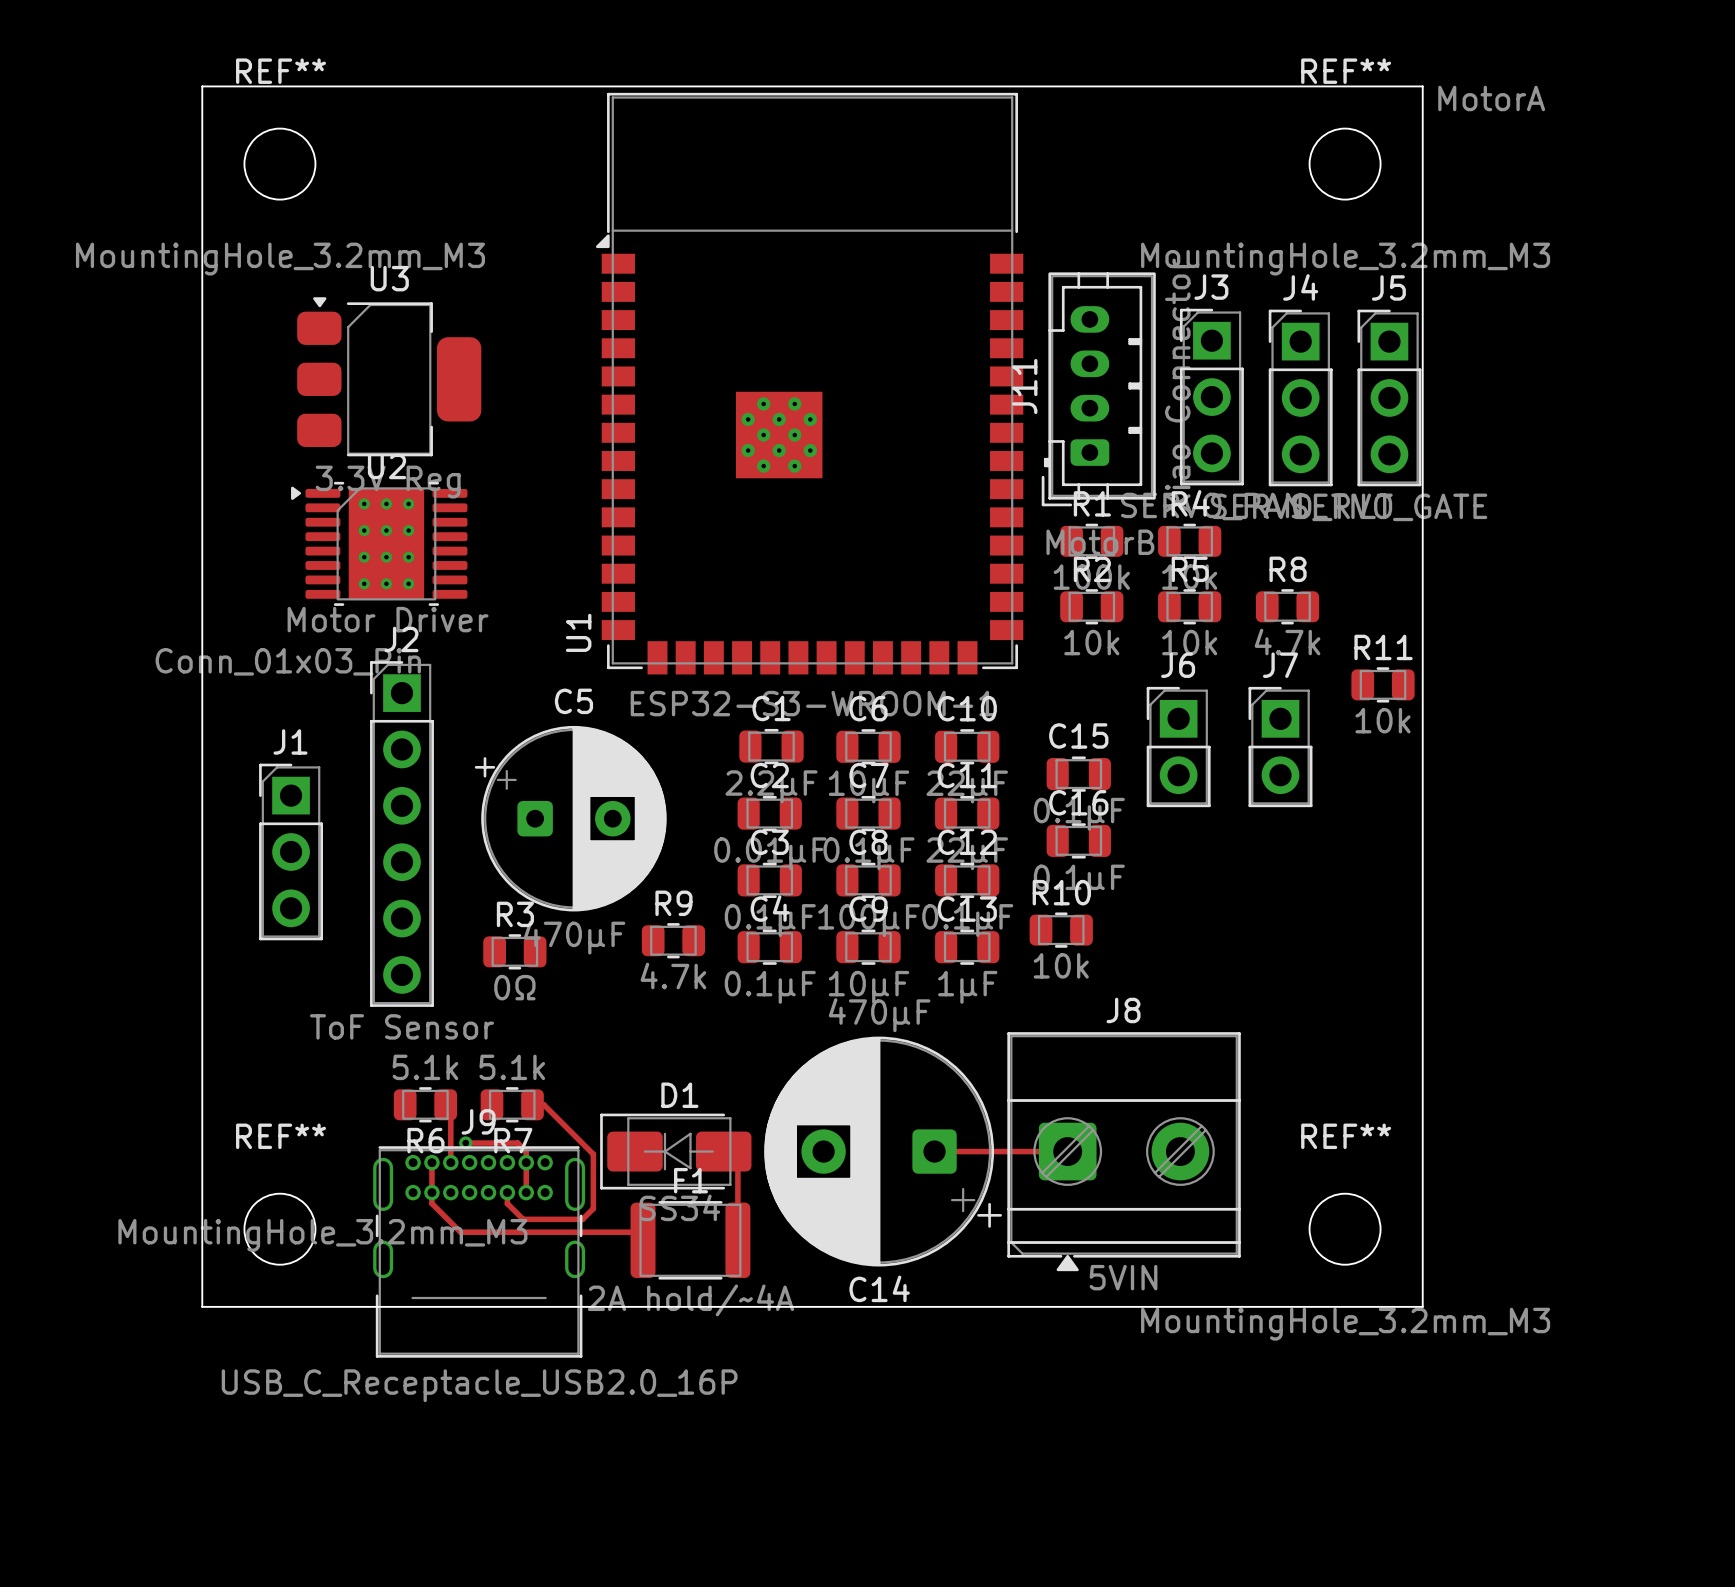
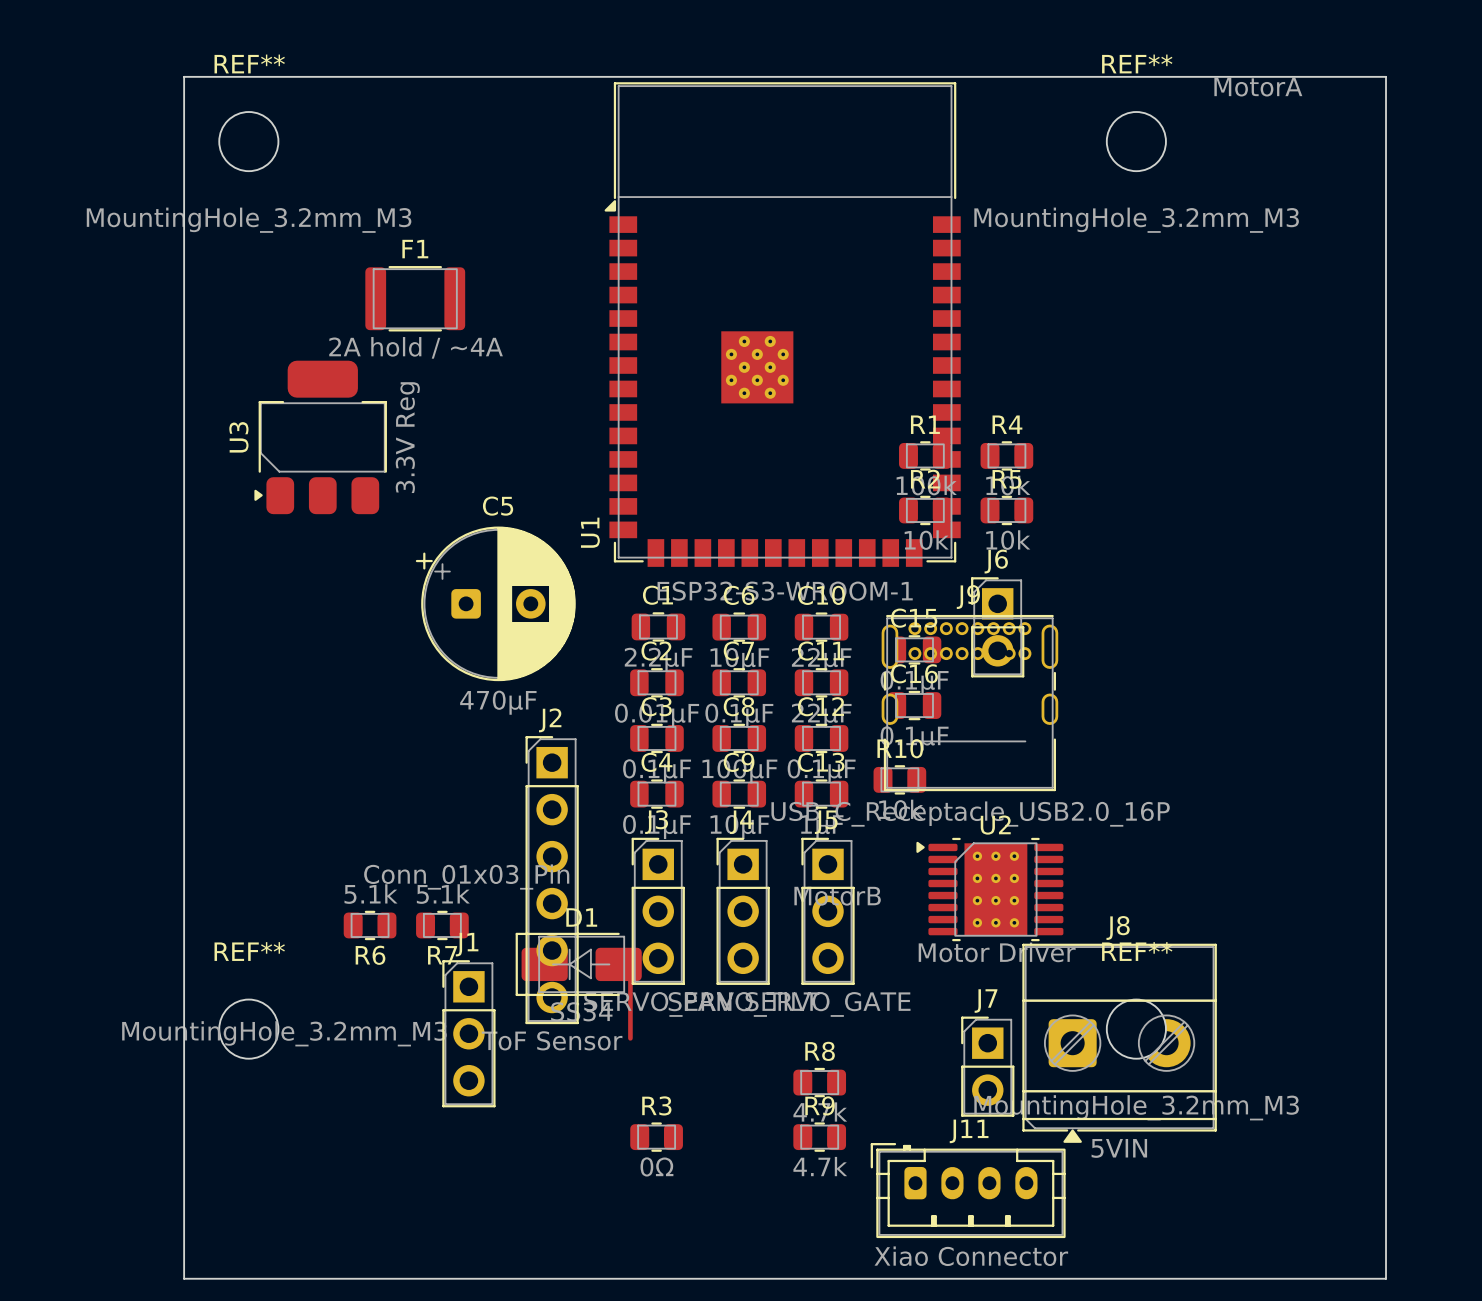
board edge: (1422, 86) (1422, 1306) (202, 1306) -> (1201, 76) (1386, 76) (1386, 1278) (184, 1278) (184, 1093)
U3 rotation: 0° (389, 376) -> 90° counterclockwise (320, 437)
U3 position: (389, 376) -> (320, 437)
U1 position: (809, 383) -> (782, 324)
J11 rotation: 0° (1098, 389) -> 90° clockwise (968, 1190)
J11 position: (1098, 389) -> (968, 1190)
J3 position: (1211, 397) -> (658, 911)
J4 position: (1300, 397) -> (743, 911)
J5 position: (1389, 397) -> (828, 911)
U2 position: (379, 543) -> (989, 889)
R8 position: (1287, 606) -> (819, 1082)
R11: 10k (1383, 684) -> none
J7 position: (1280, 747) -> (987, 1066)
C5 position: (570, 818) -> (495, 603)
J2 position: (401, 834) -> (552, 880)
J1 position: (291, 851) -> (468, 1033)
R9 position: (673, 940) -> (819, 1137)
R3 position: (514, 951) -> (656, 1137)
track: (445, 1104) (450, 1109) (450, 1162) -> none
track: (532, 1104) (543, 1104) (593, 1154) (593, 1208) (582, 1219) (523, 1219) (507, 1203) (507, 1192) -> none
track: (465, 1143) (517, 1143) (526, 1151) (526, 1192) -> none
via: (465, 1143) -> none
C14: 470µF (883, 1151) -> none
track: (934, 1151) (1067, 1151) -> none
J8 position: (1124, 1151) -> (1119, 1043)
track: (431, 1162) (431, 1203) (460, 1232) (634, 1232) (643, 1240) -> none
F1 position: (690, 1240) -> (415, 298)
J9 position: (479, 1251) -> (969, 703)
F1 value: 2A hold/~4A (690, 1300) -> 2A hold / ~4A (416, 347)

